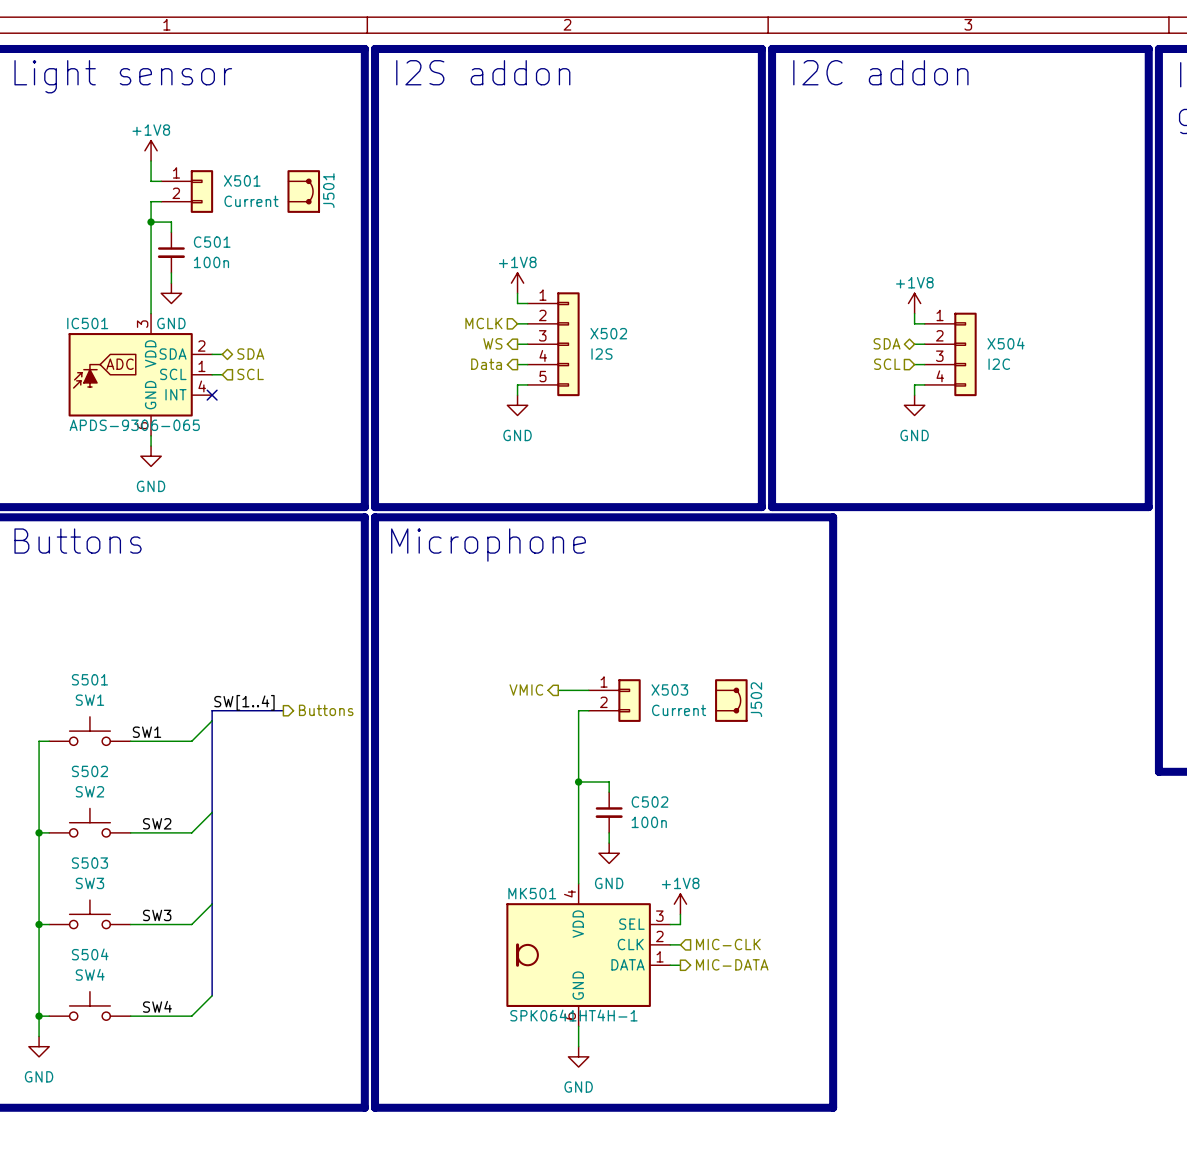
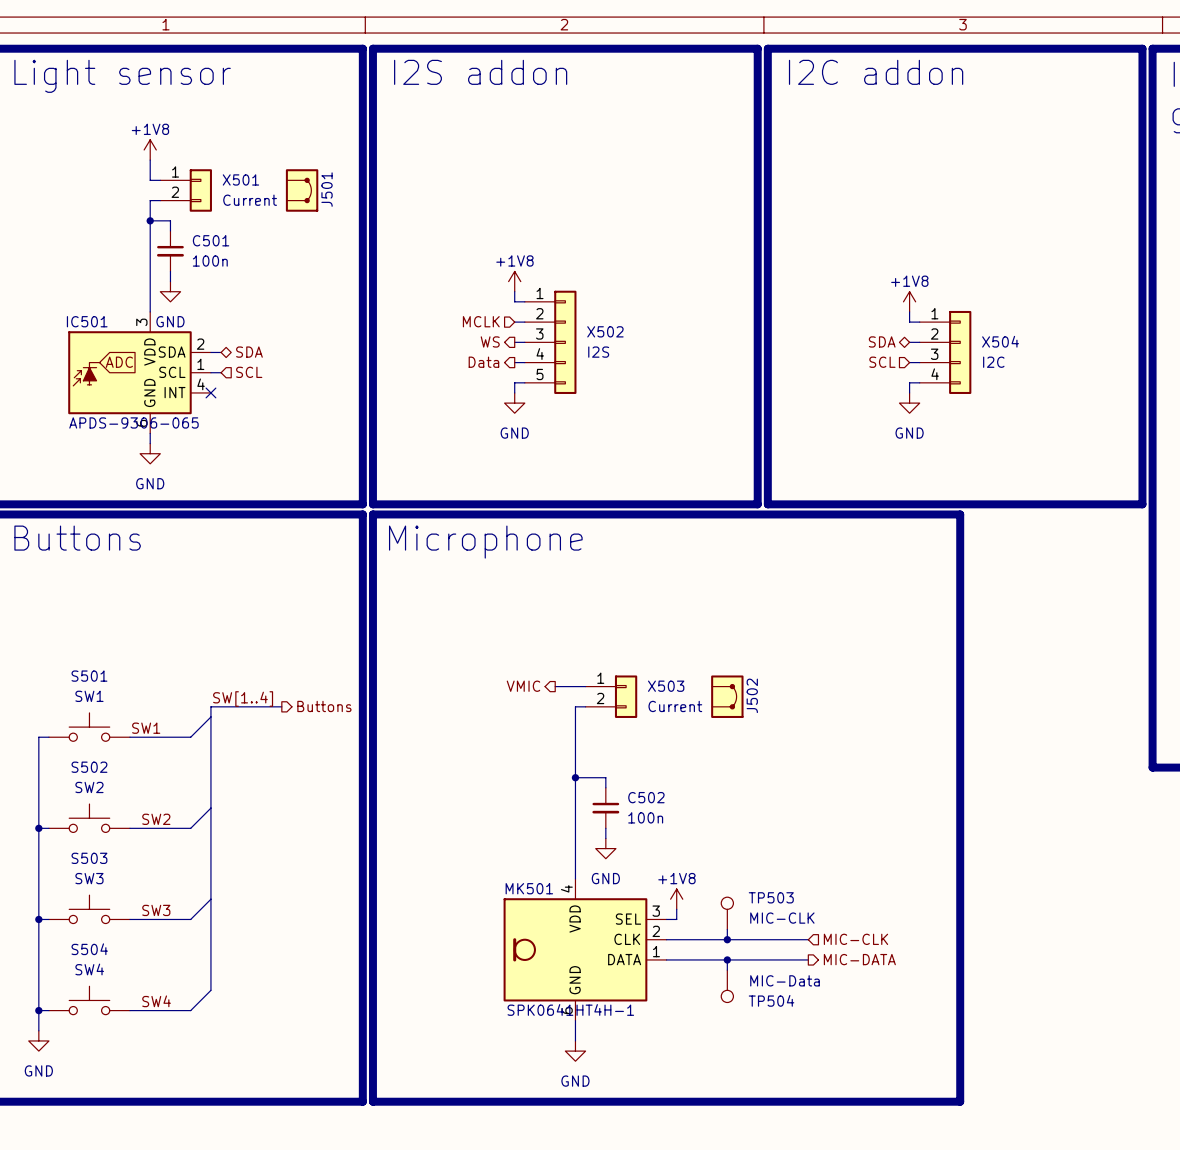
line: (833, 517) (833, 1107) -> (828, 514) (960, 514) (960, 1101) (828, 1101)
TP503: none -> MIC-CLK (727, 913)
wire: none -> (727, 929) (727, 939)
wire: none -> (676, 939) (808, 939)
hierarchical label position: MIC-CLK (728, 944) -> MIC-CLK (855, 939)
junction: none -> (727, 939)
hierarchical label position: MIC-DATA (732, 964) -> MIC-DATA (859, 959)
wire: none -> (676, 959) (808, 959)
wire: none -> (727, 959) (727, 970)
junction: none -> (727, 959)
TP504: none -> MIC-Data (727, 986)

